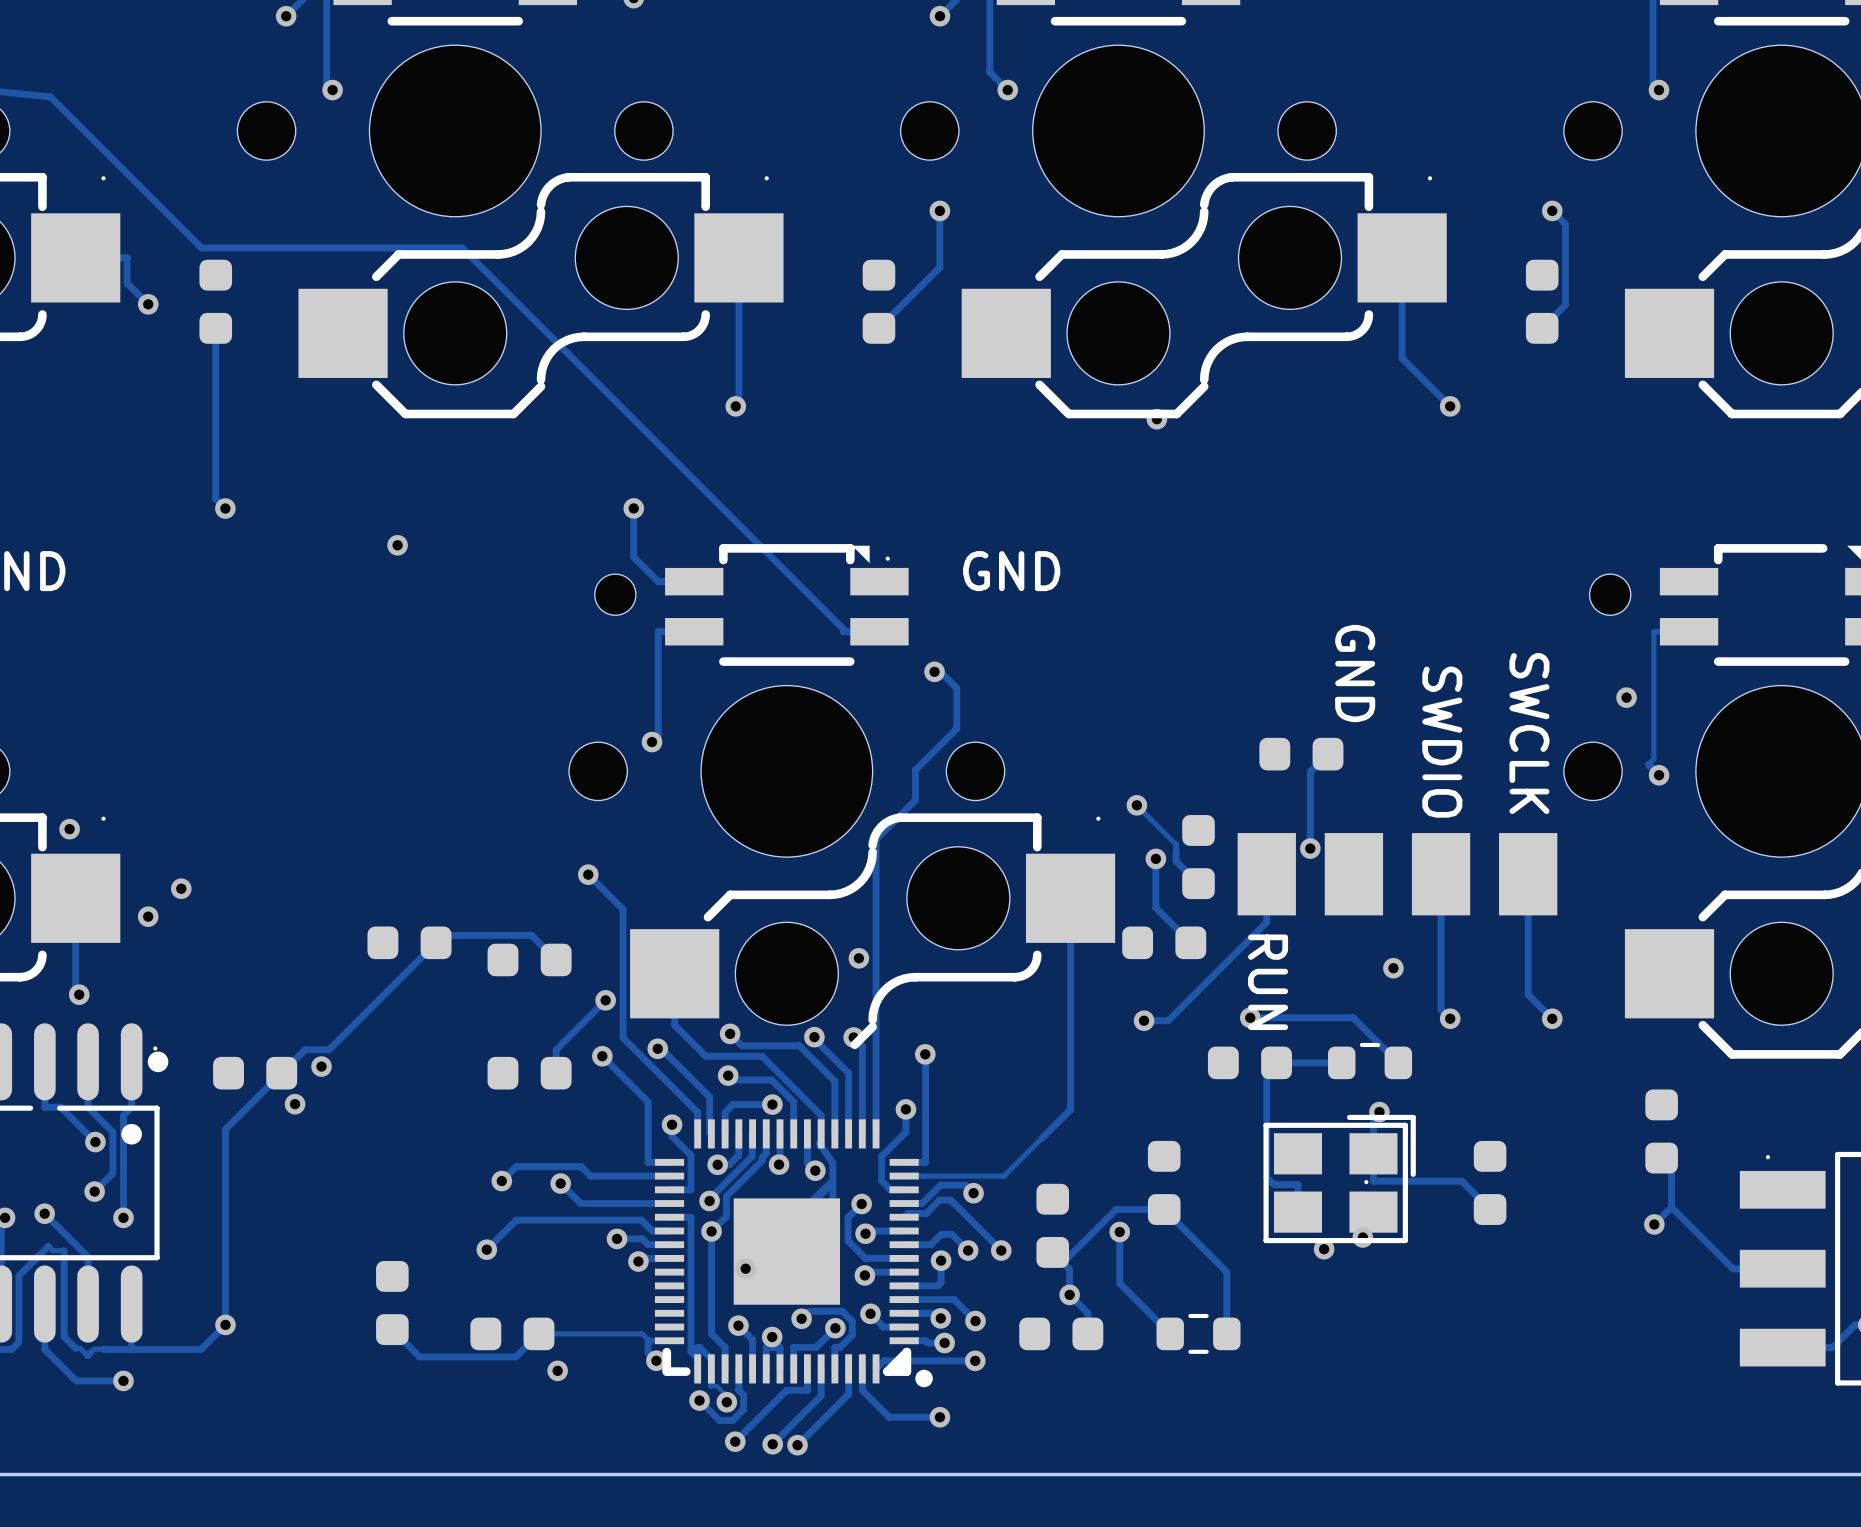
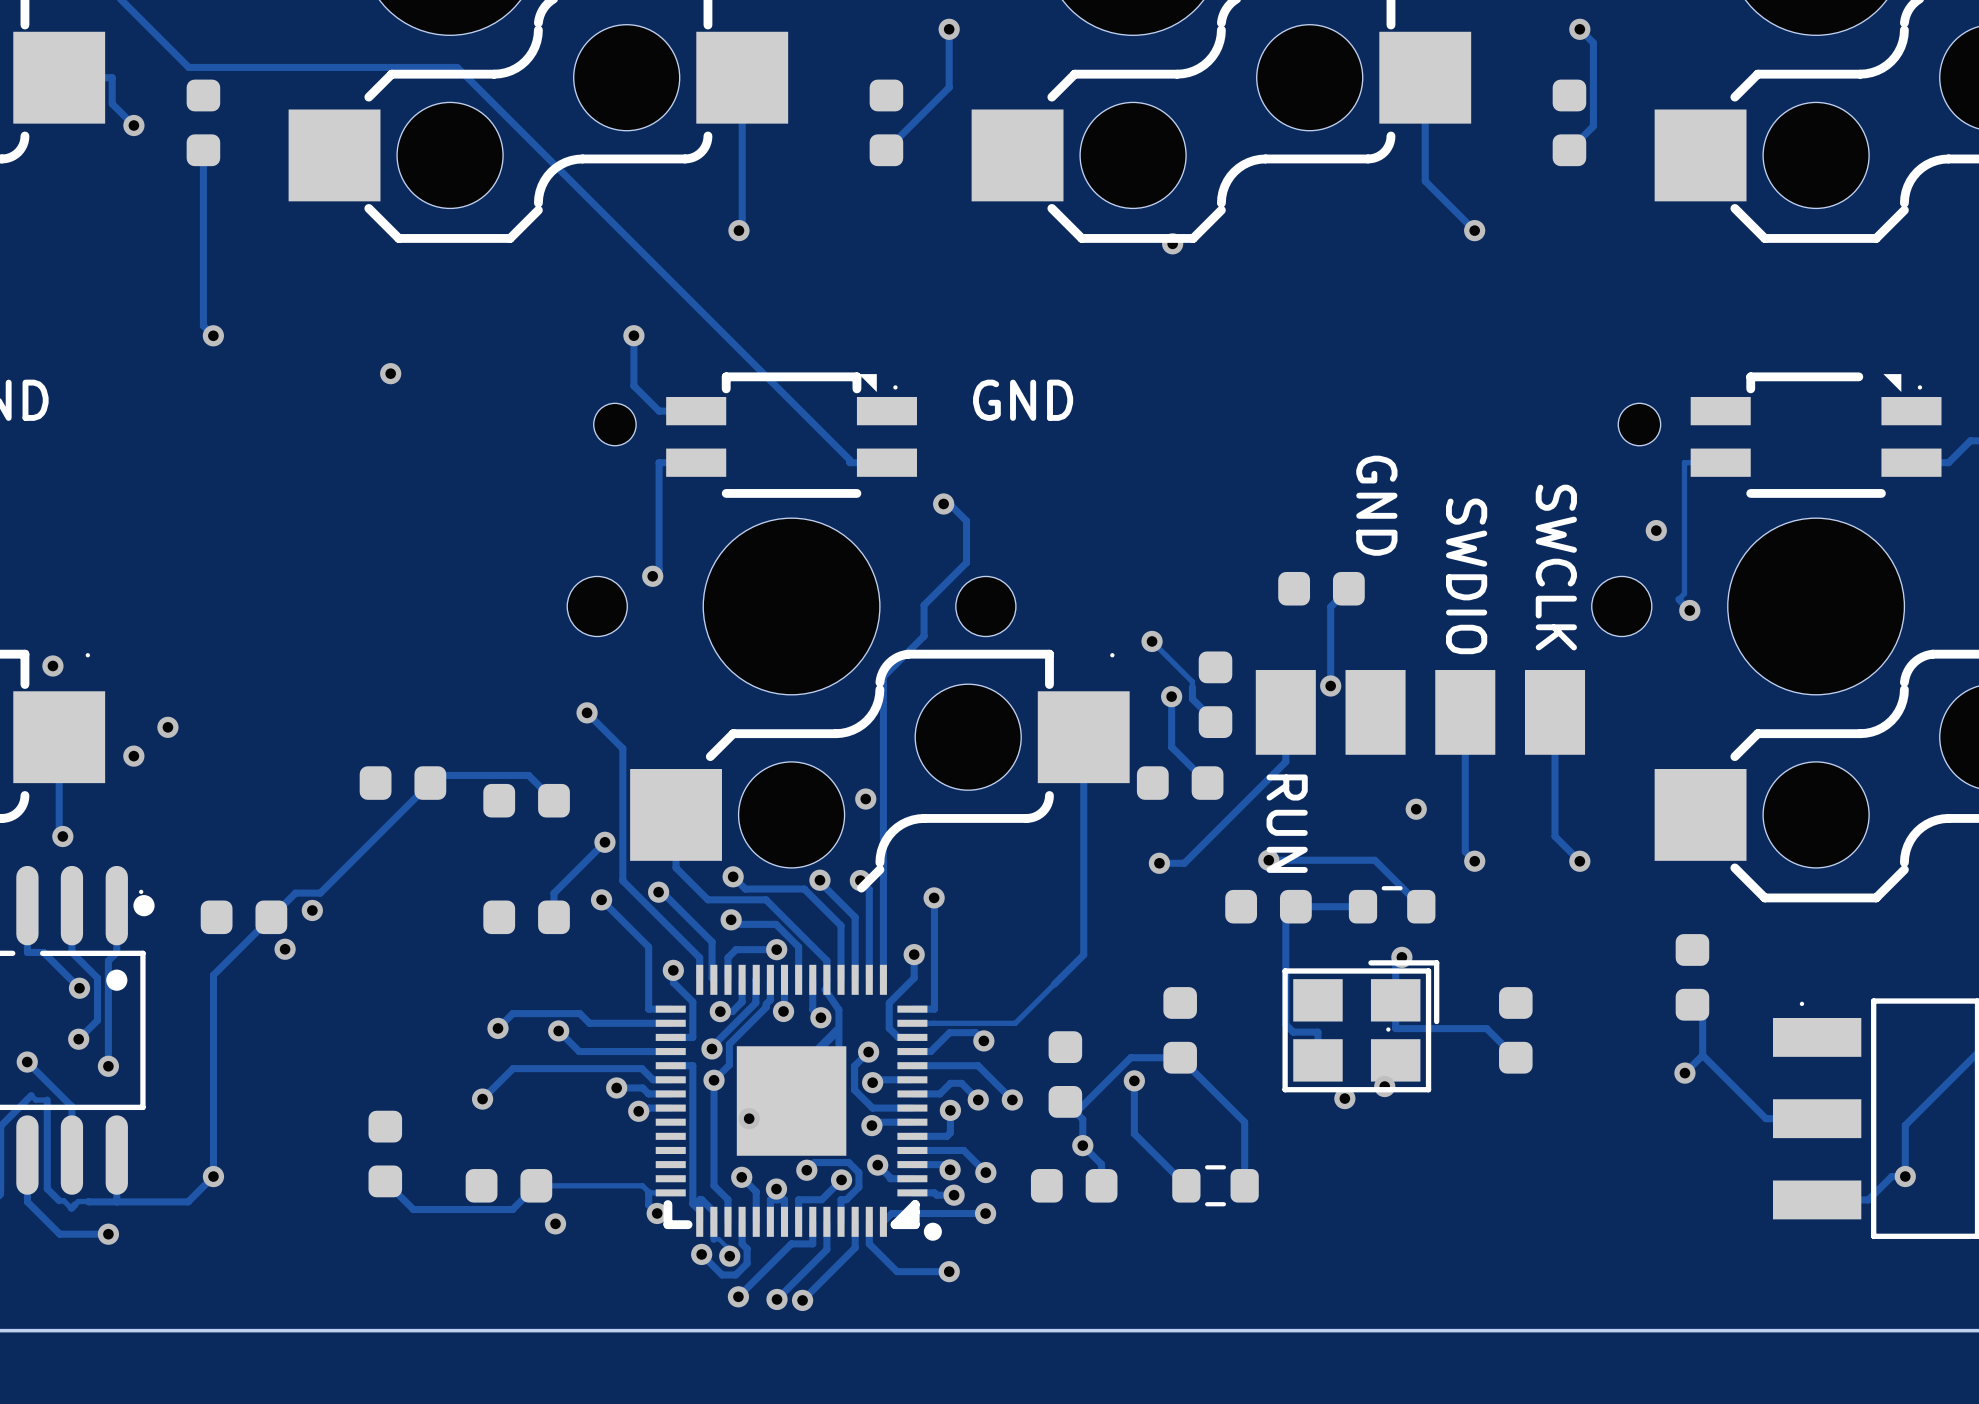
track: (967, 1217) (950, 1200) (939, 1200) (926, 1213) (907, 1213) (904, 1217) -> (978, 1065) (912, 1065)

